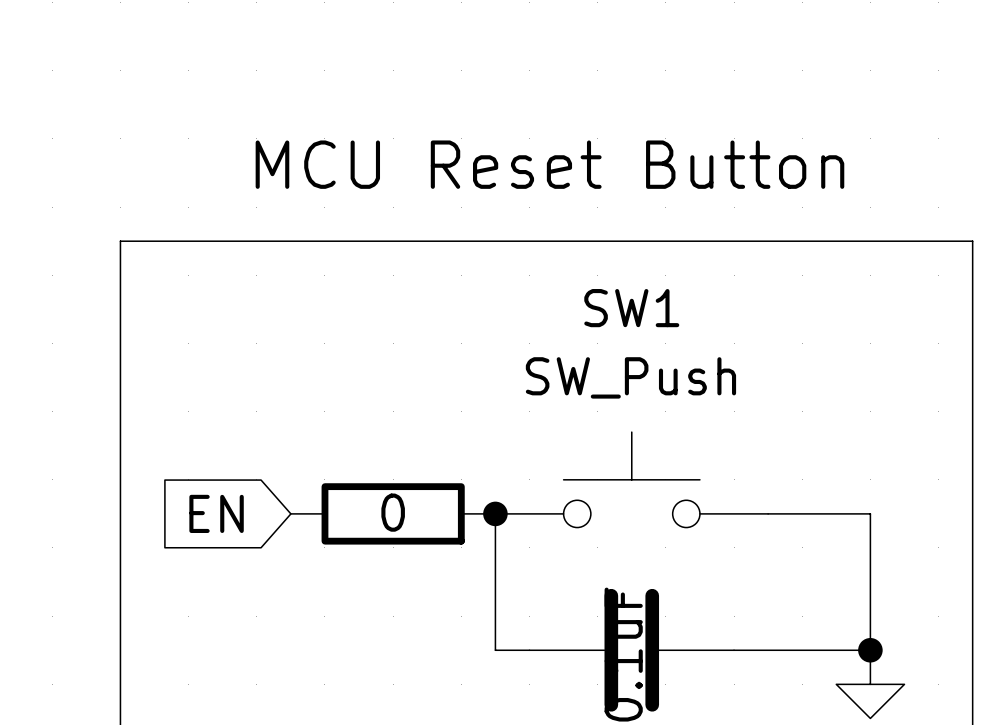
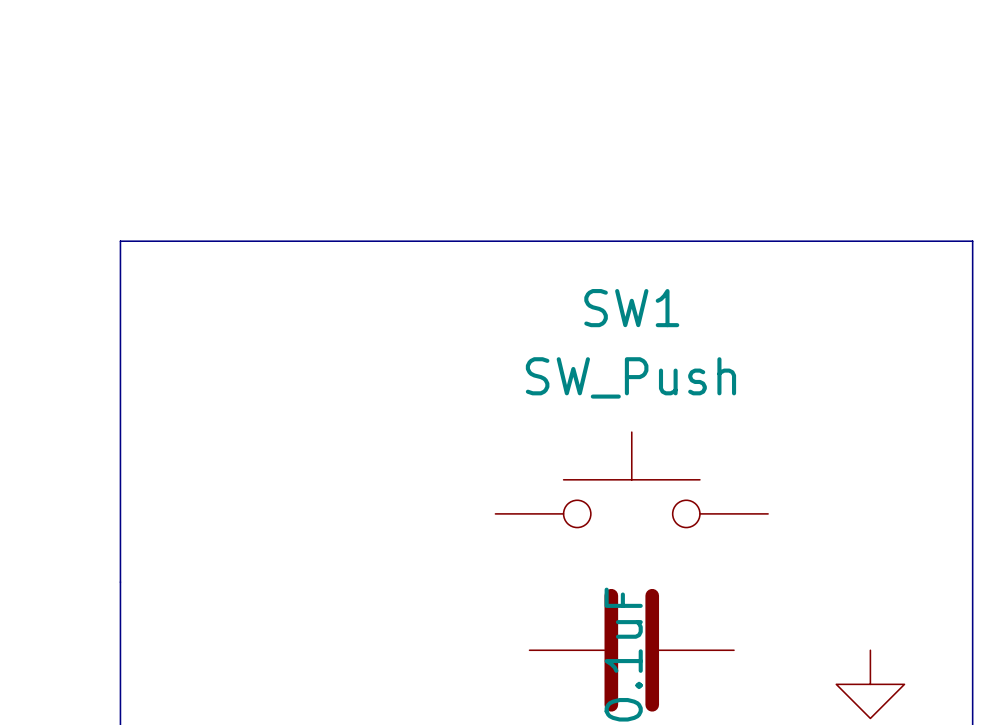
text: MCU Reset Button (549, 164) -> none
global label: EN (216, 513) -> none
part: 0 (393, 513) -> none
wire: (495, 513) (495, 650) (529, 650) -> none
junction: (495, 513) -> none
wire: (768, 513) (870, 513) (870, 650) (734, 650) -> none
junction: (870, 650) -> none

